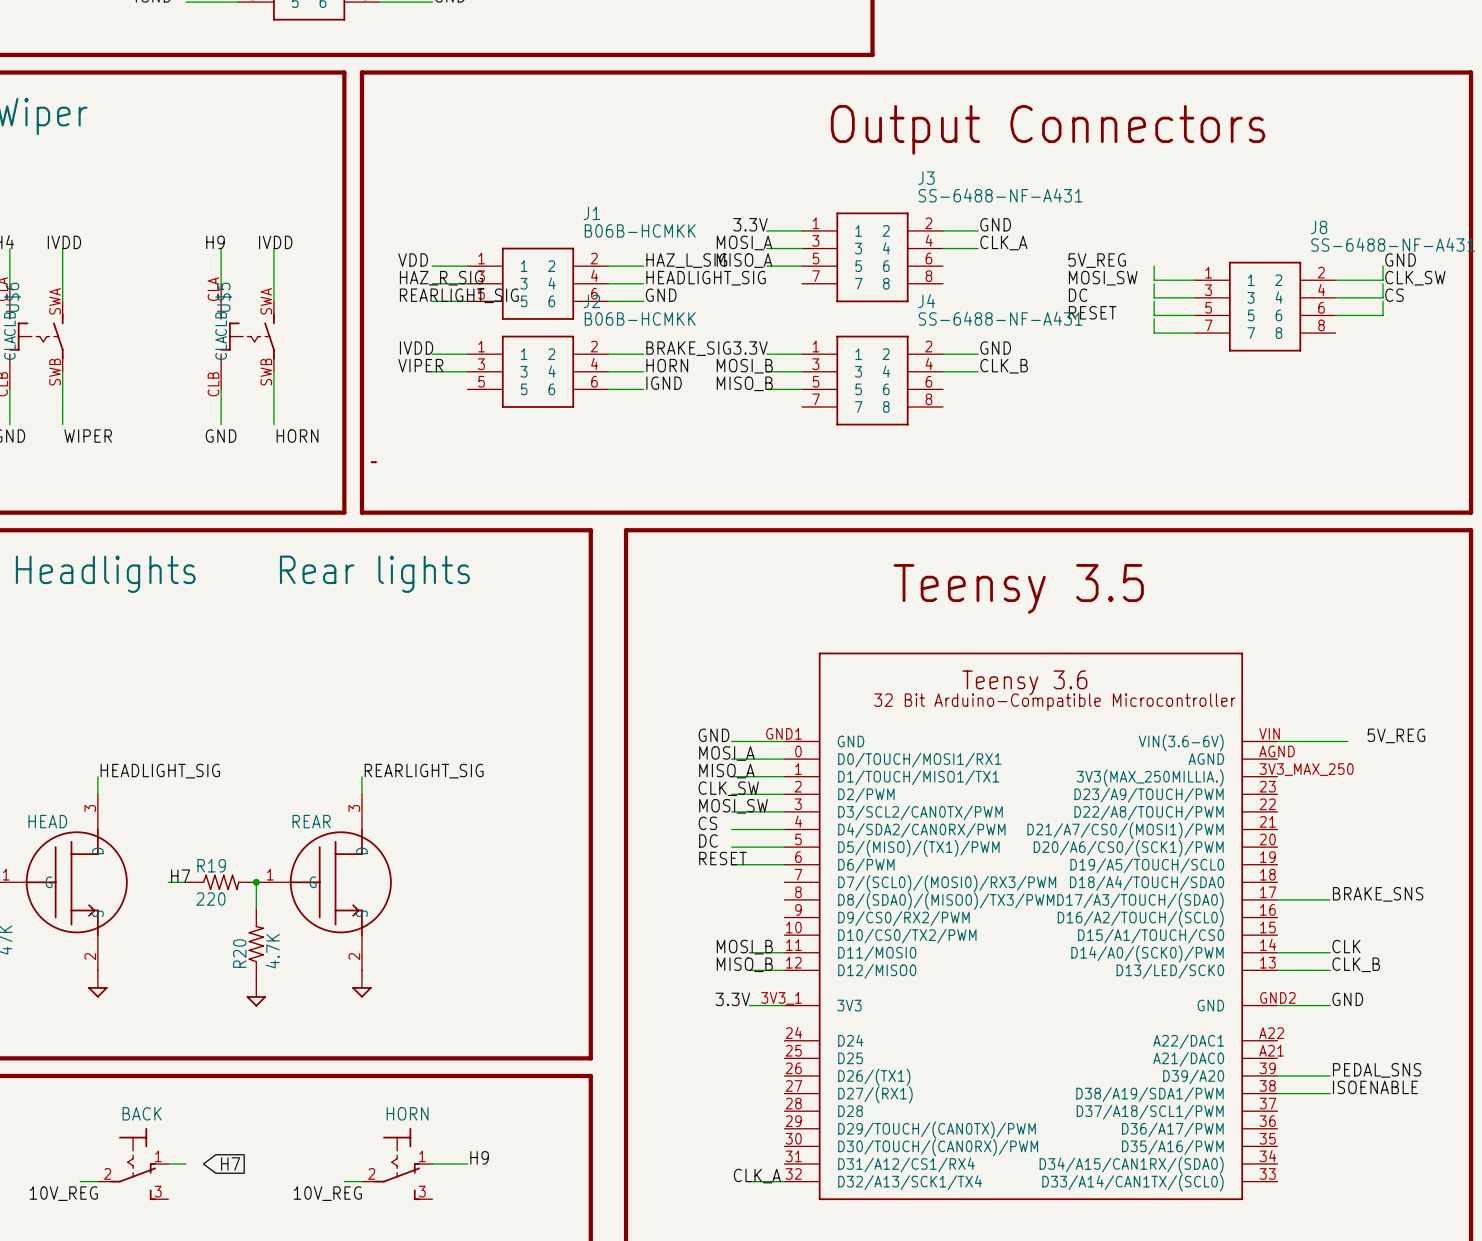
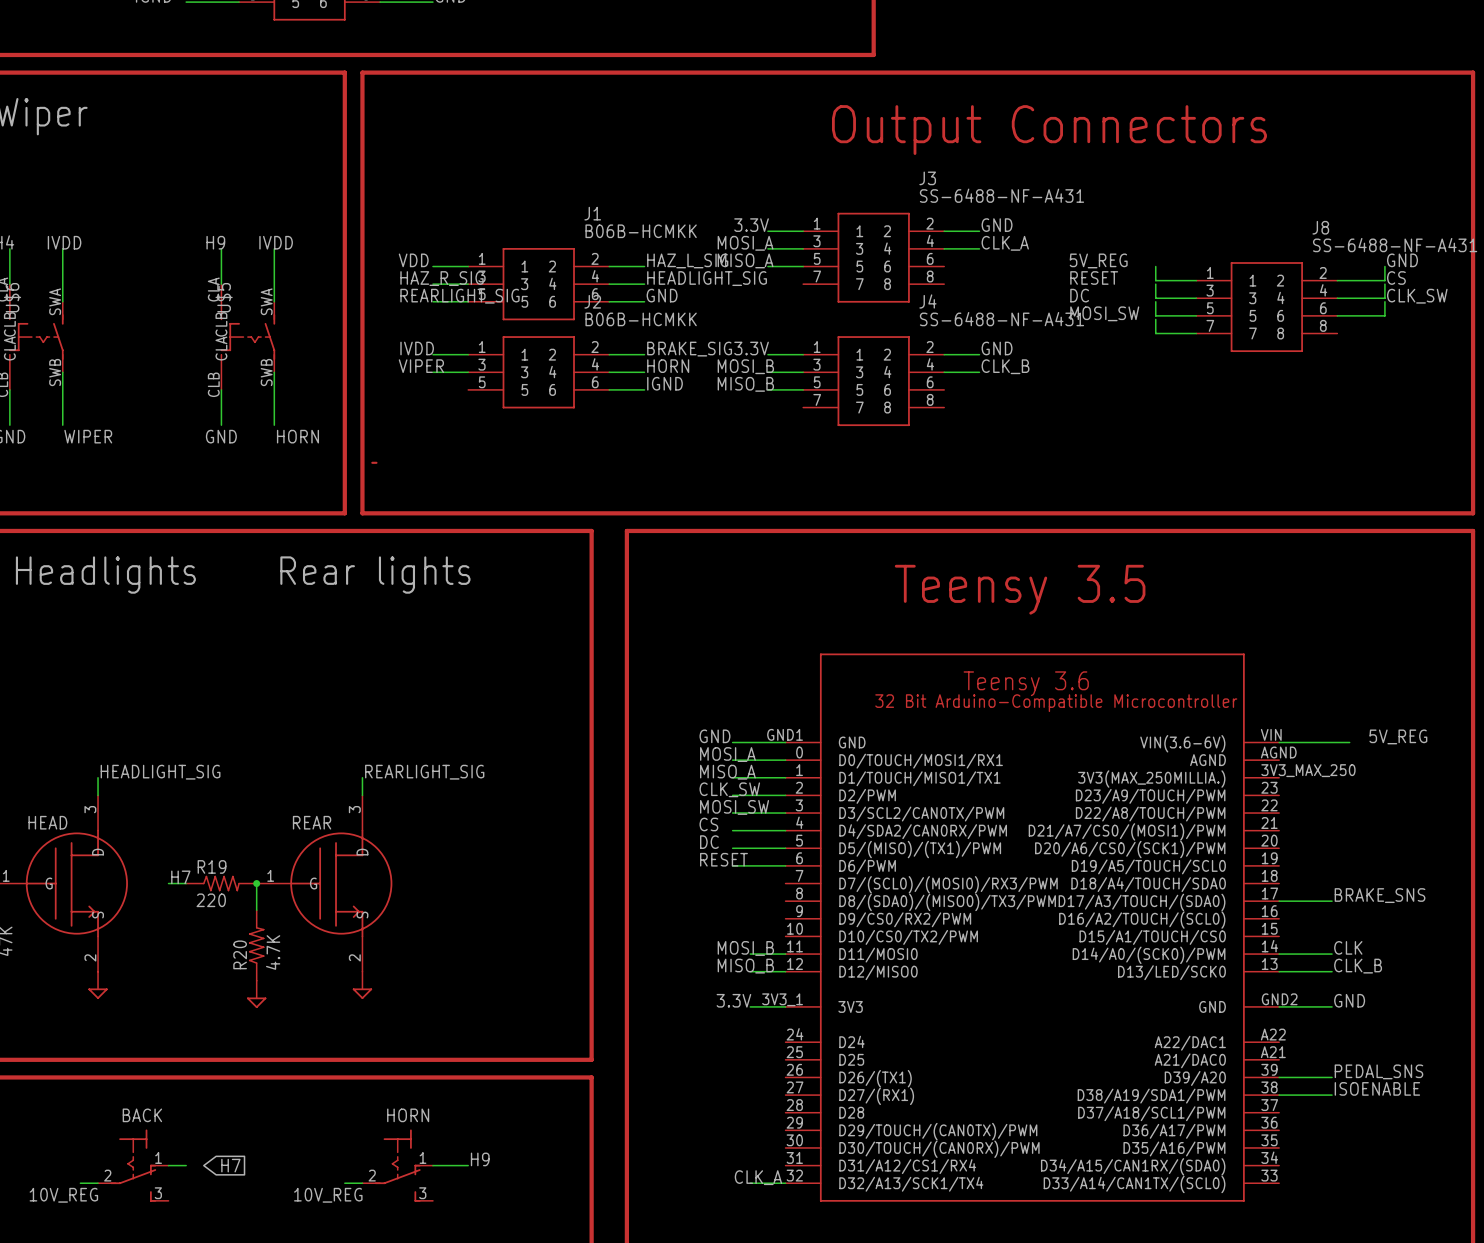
label: MOSI_SW (1103, 278) -> RESET (1094, 277)
label: CLK_SW (1415, 278) -> CS (1396, 277)
label: CS (1394, 295) -> CLK_SW (1417, 296)
label: RESET (1092, 312) -> MOSI_SW (1104, 313)

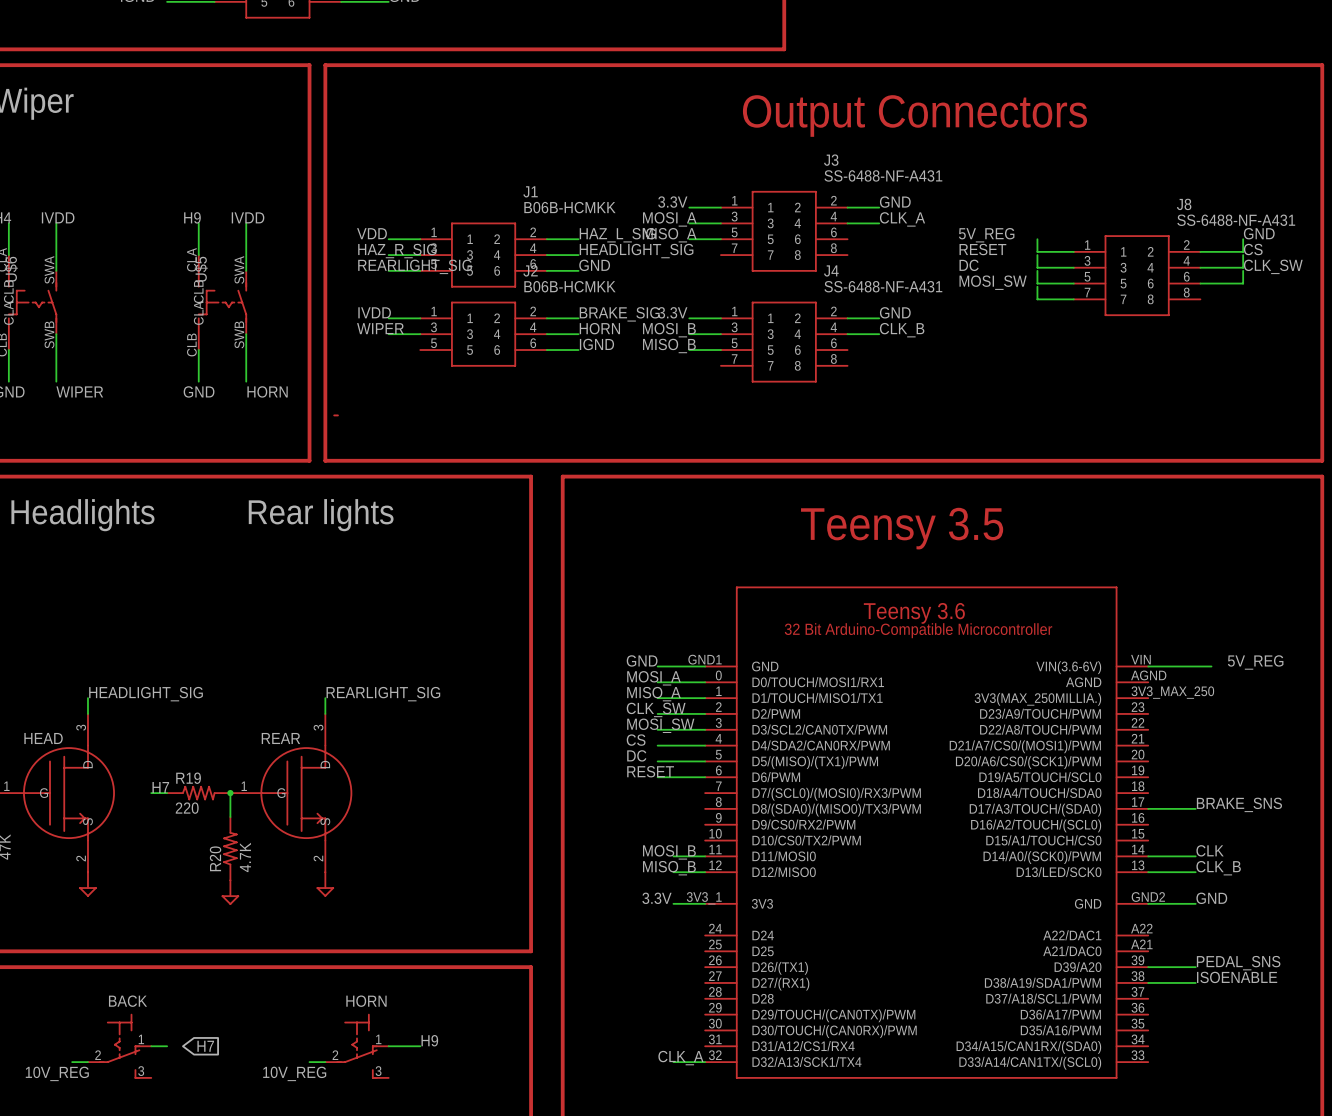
label: VIPER (421, 366) -> WIPER (380, 328)

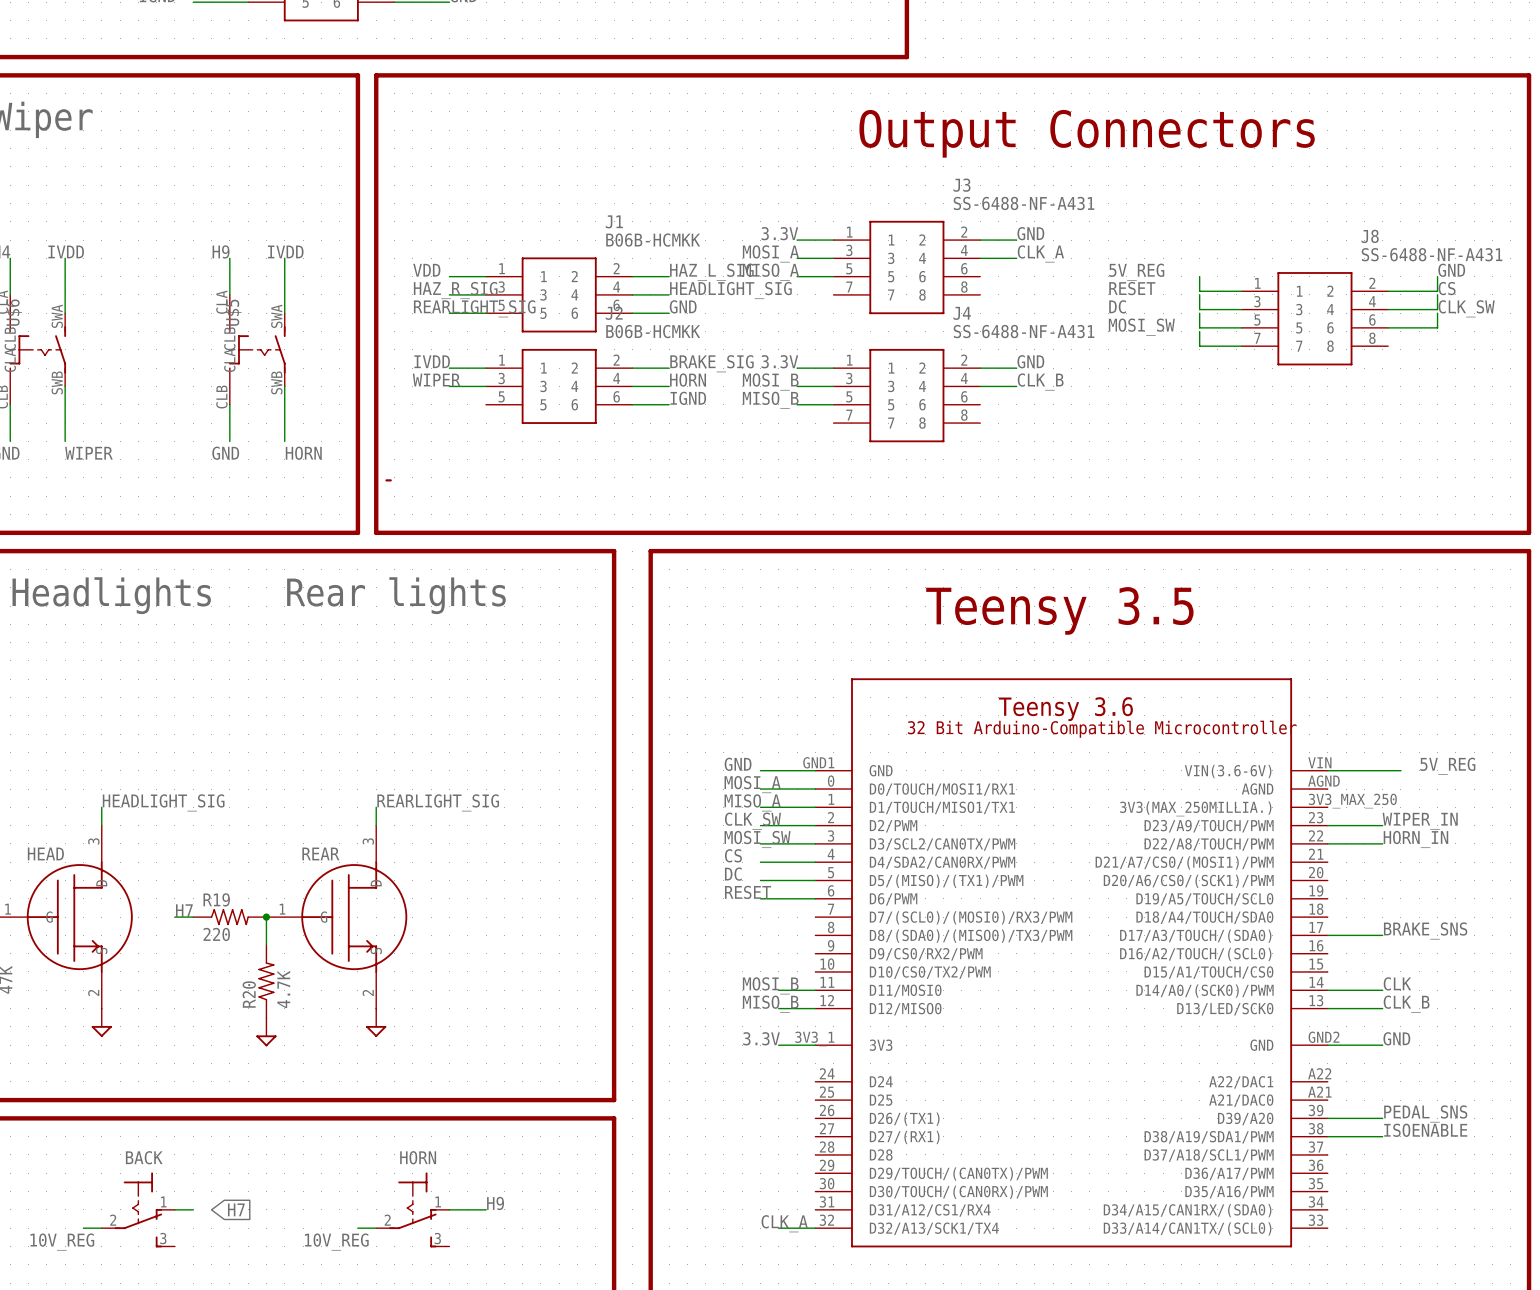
label: none -> WIPER_IN (1420, 821)
wire: none -> (1327, 825) (1382, 825)
label: none -> HORN_IN (1415, 839)
wire: none -> (1327, 843) (1382, 843)

